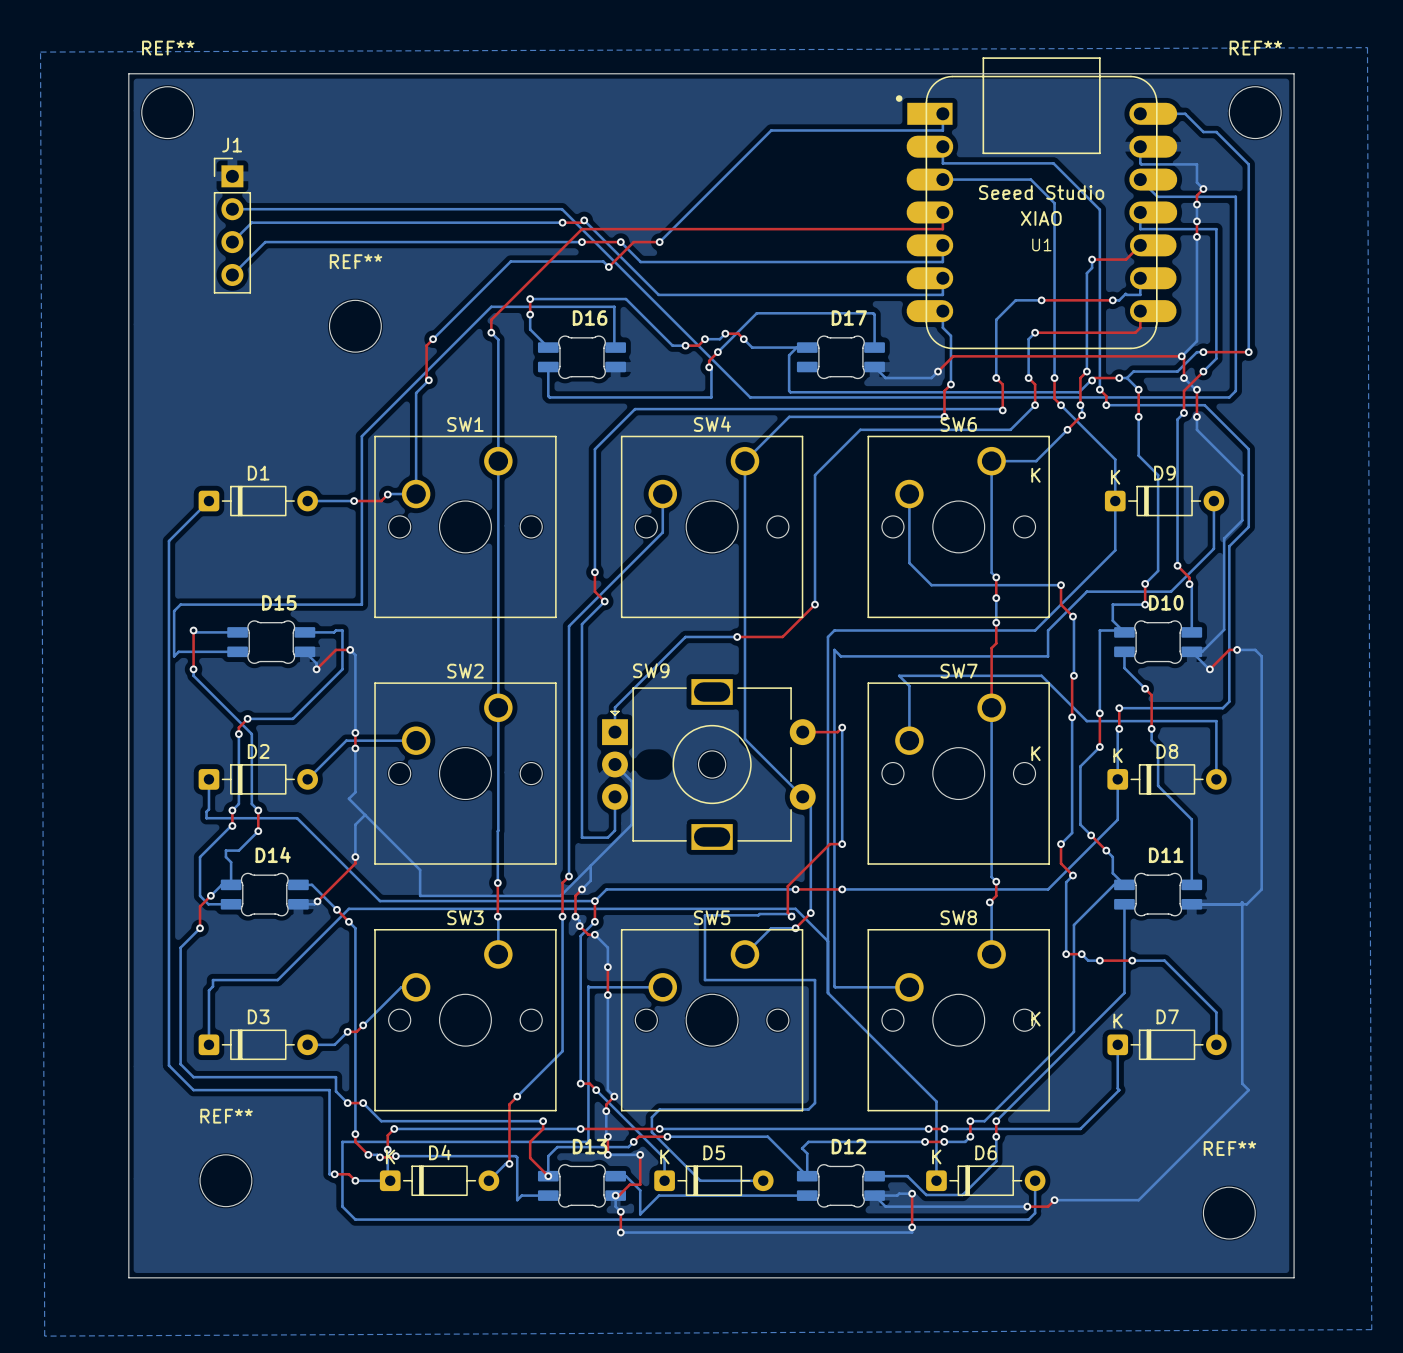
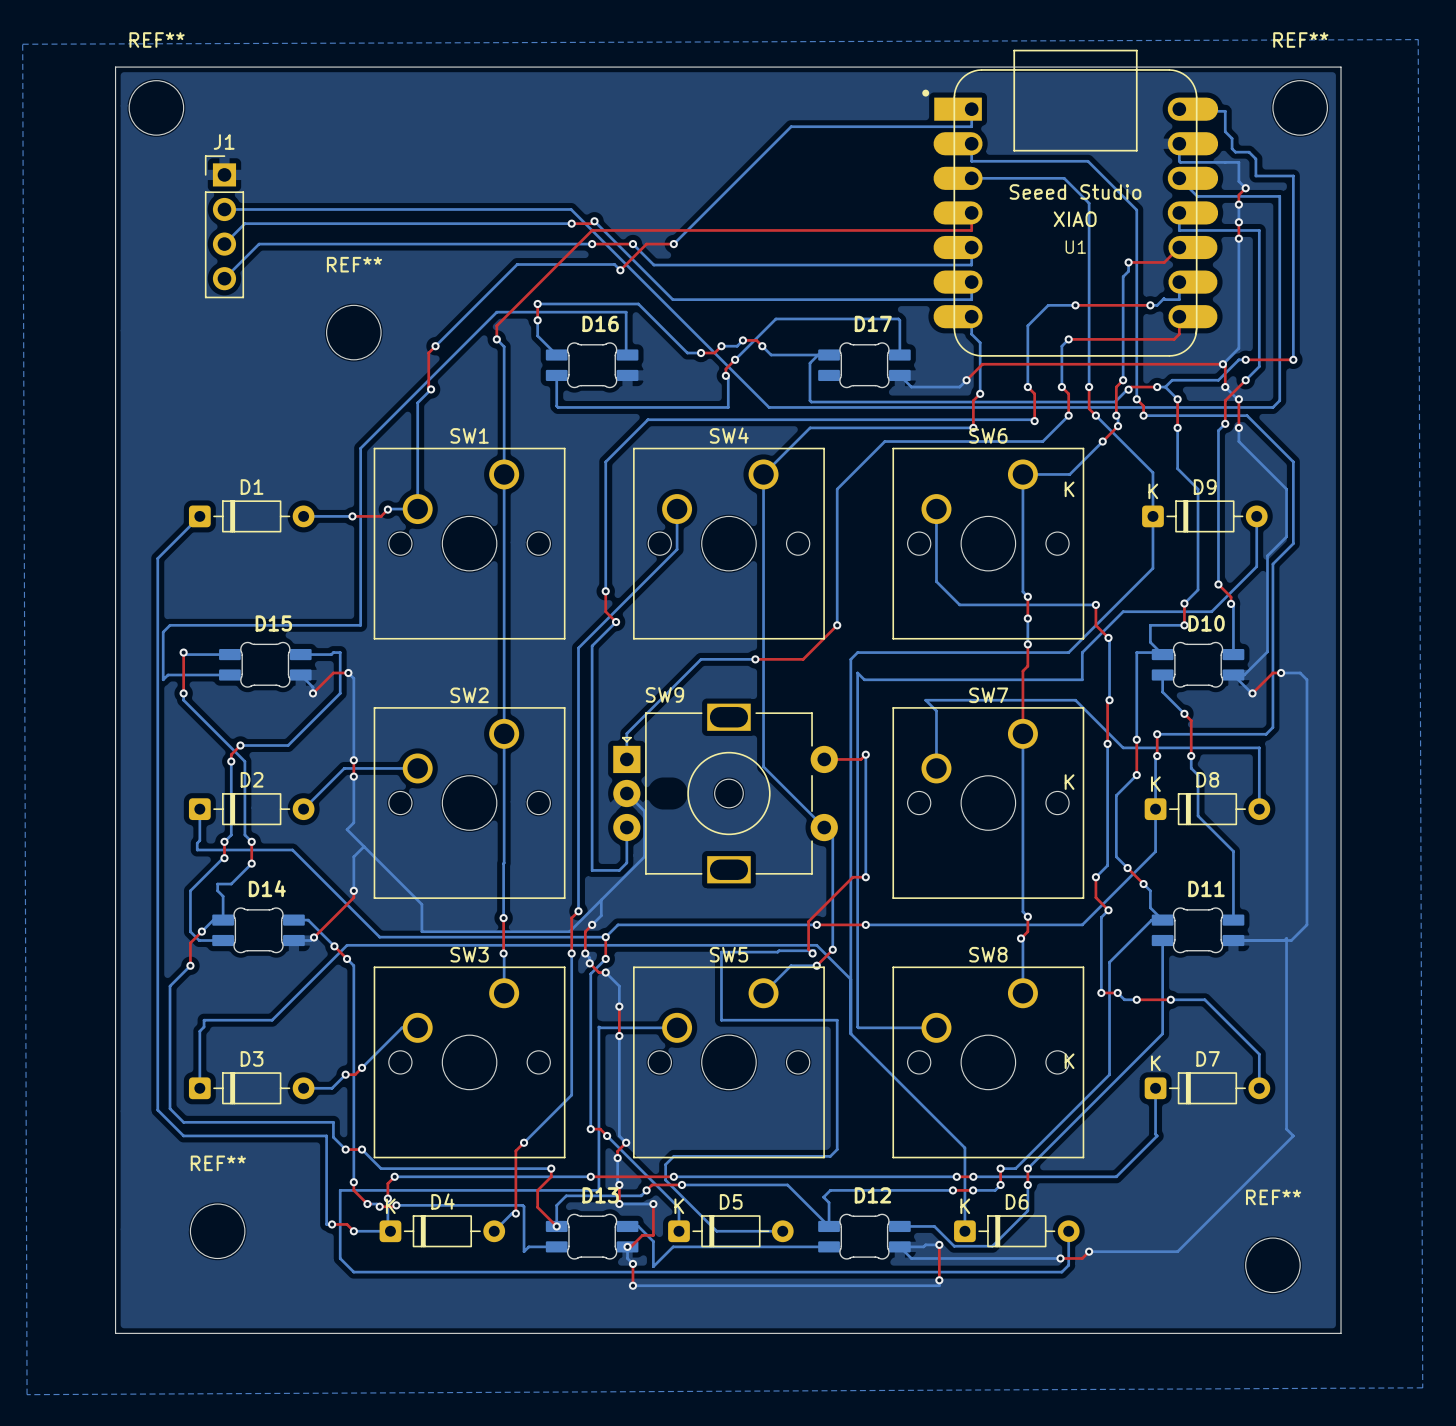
bottom track: (1140, 113) (1185, 113) (1203, 132) (1216, 132) (1248, 164) (1248, 177) -> (1179, 109) (1181, 111) (1225, 111) (1225, 131) (1232, 138) (1232, 148) (1235, 152) (1249, 152) (1255, 158) (1255, 176) (1293, 176)

